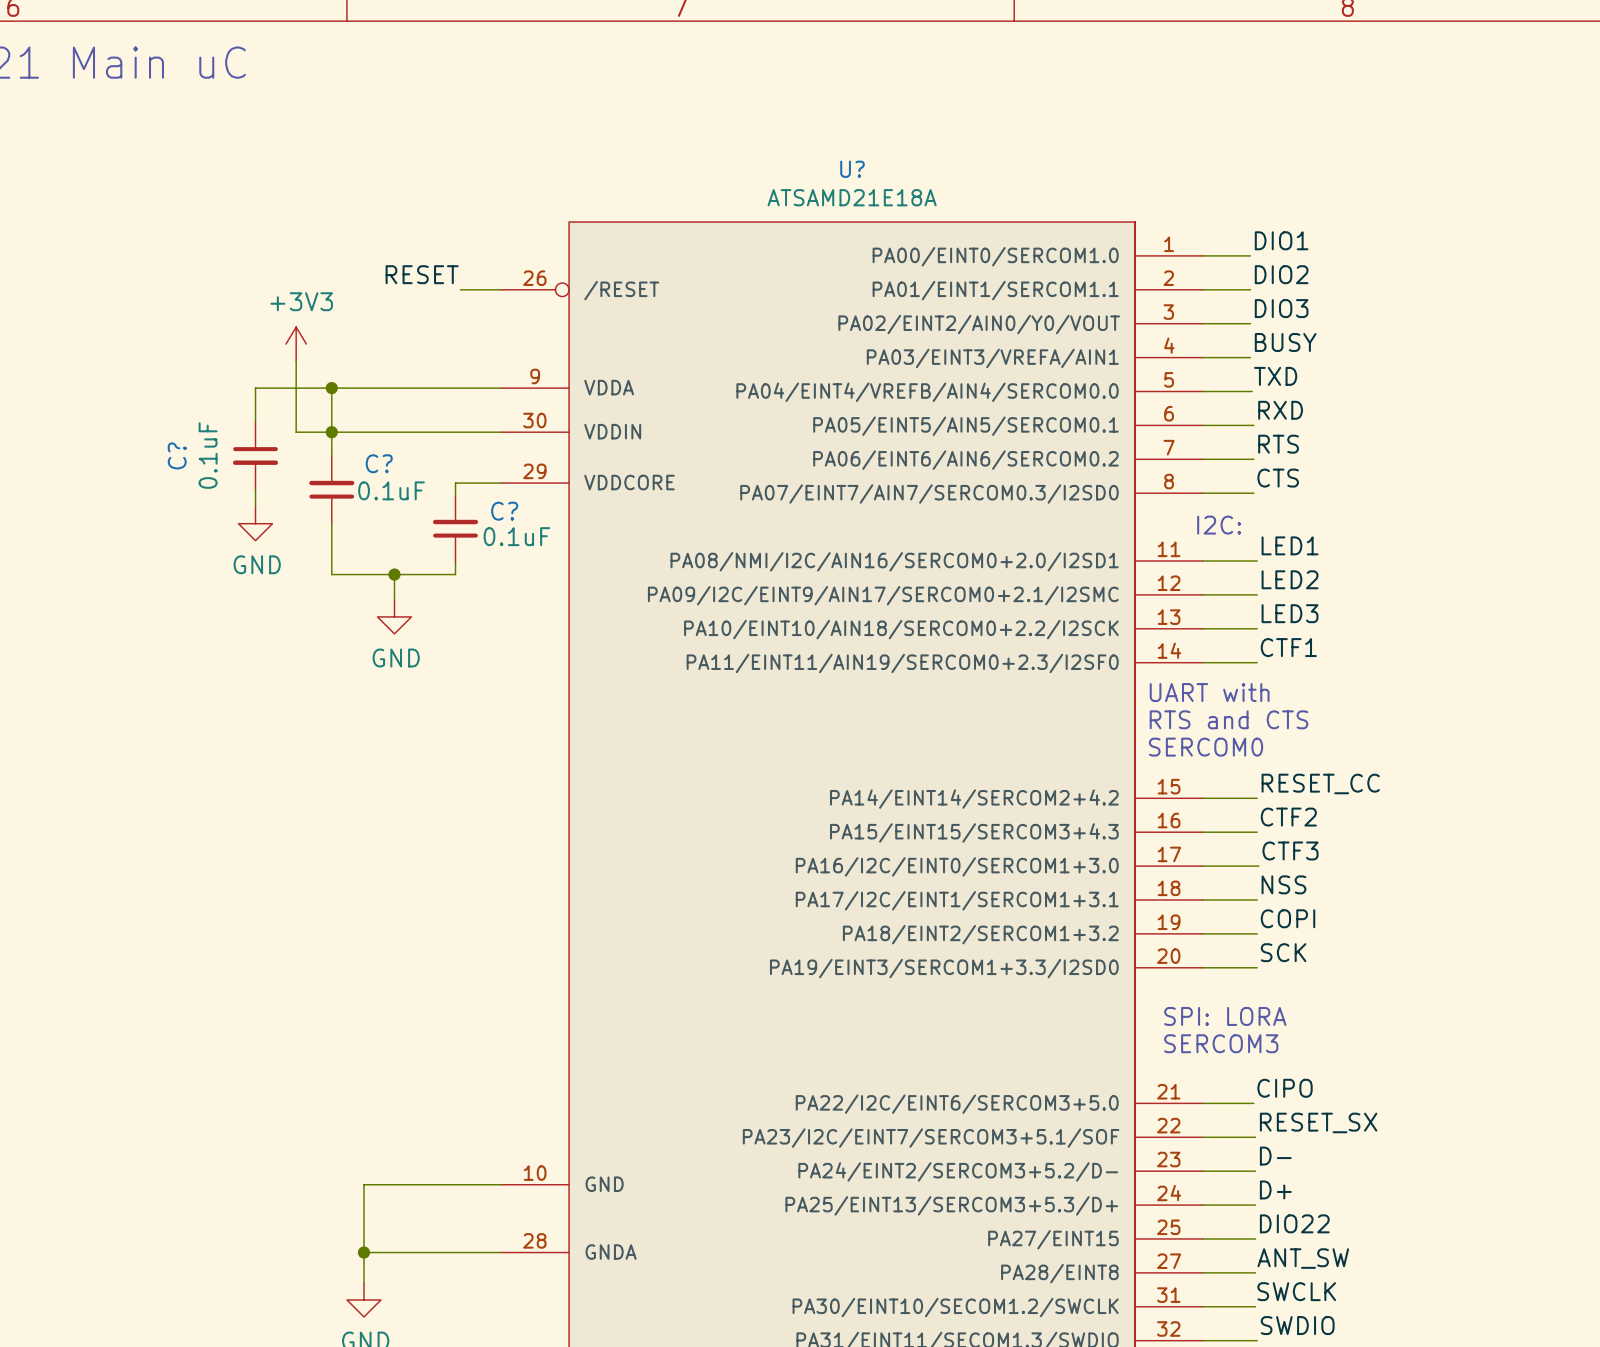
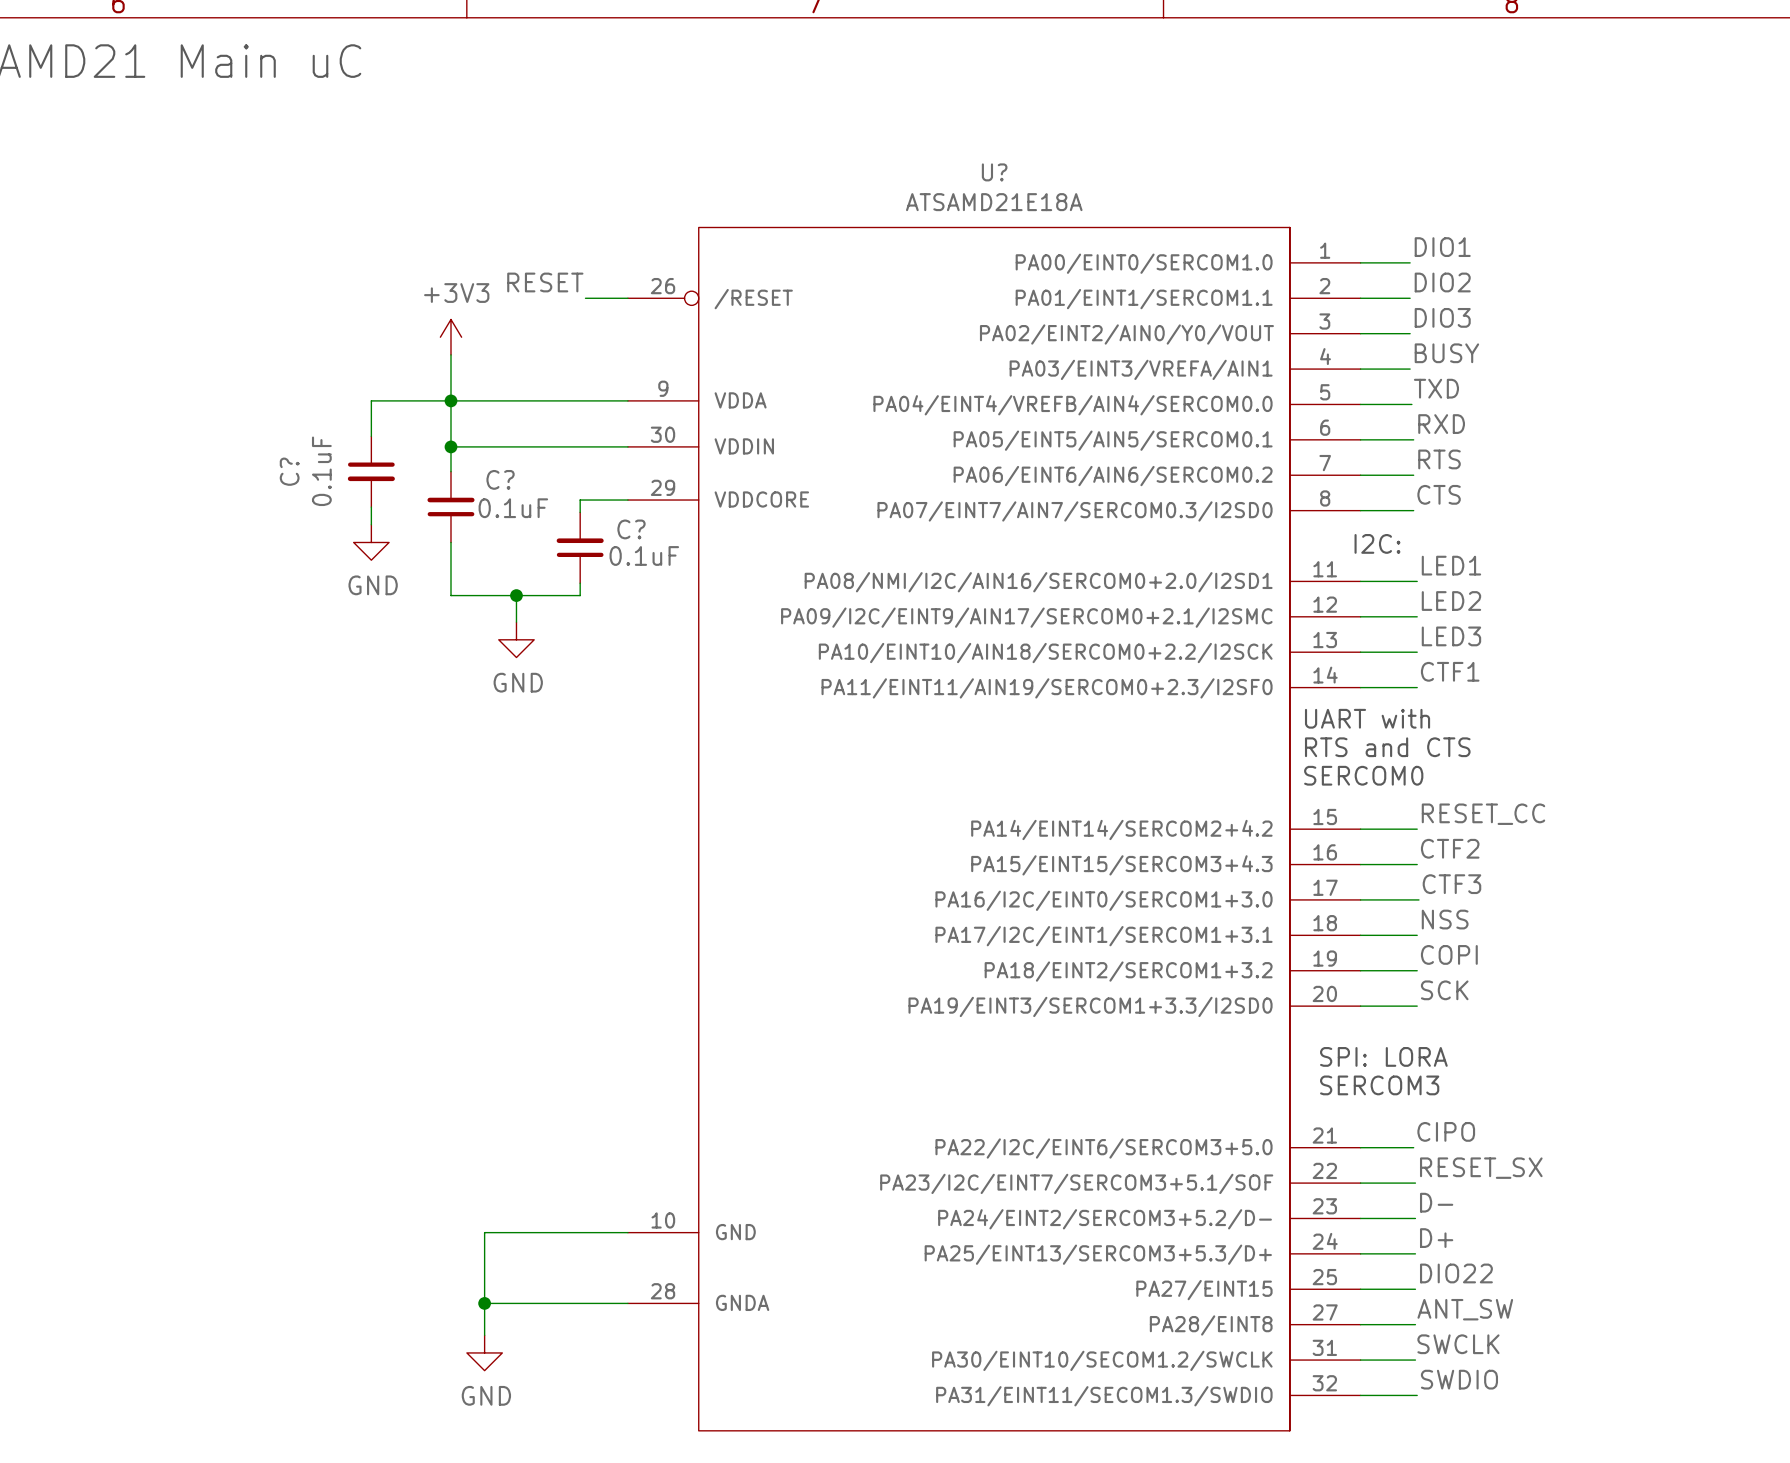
power symbol position: +3V3 (296, 344) -> +3V3 (450, 337)
wire: none -> (450, 354) (450, 400)
wire: (296, 361) (296, 432) (331, 432) -> none

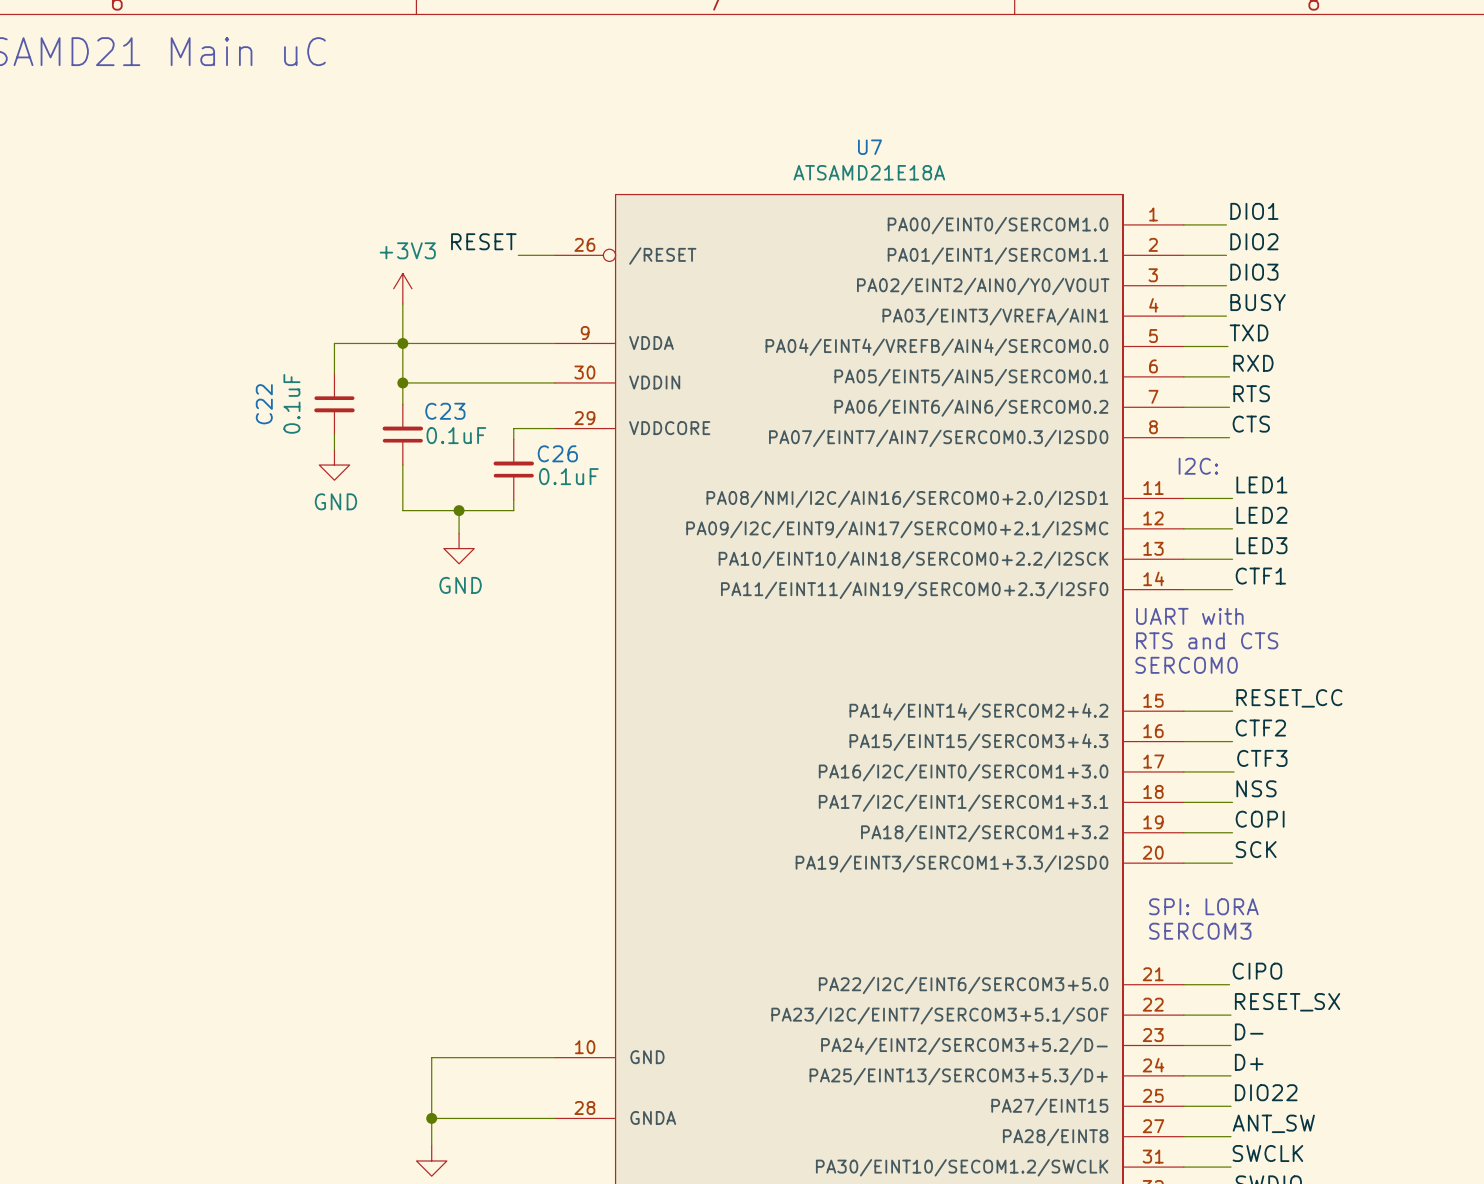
U? name: U? (994, 172) -> U7 (869, 147)
C? name: C? (289, 471) -> C22 (264, 404)
C? name: C? (500, 479) -> C23 (445, 411)
C? name: C? (631, 529) -> C26 (557, 453)

